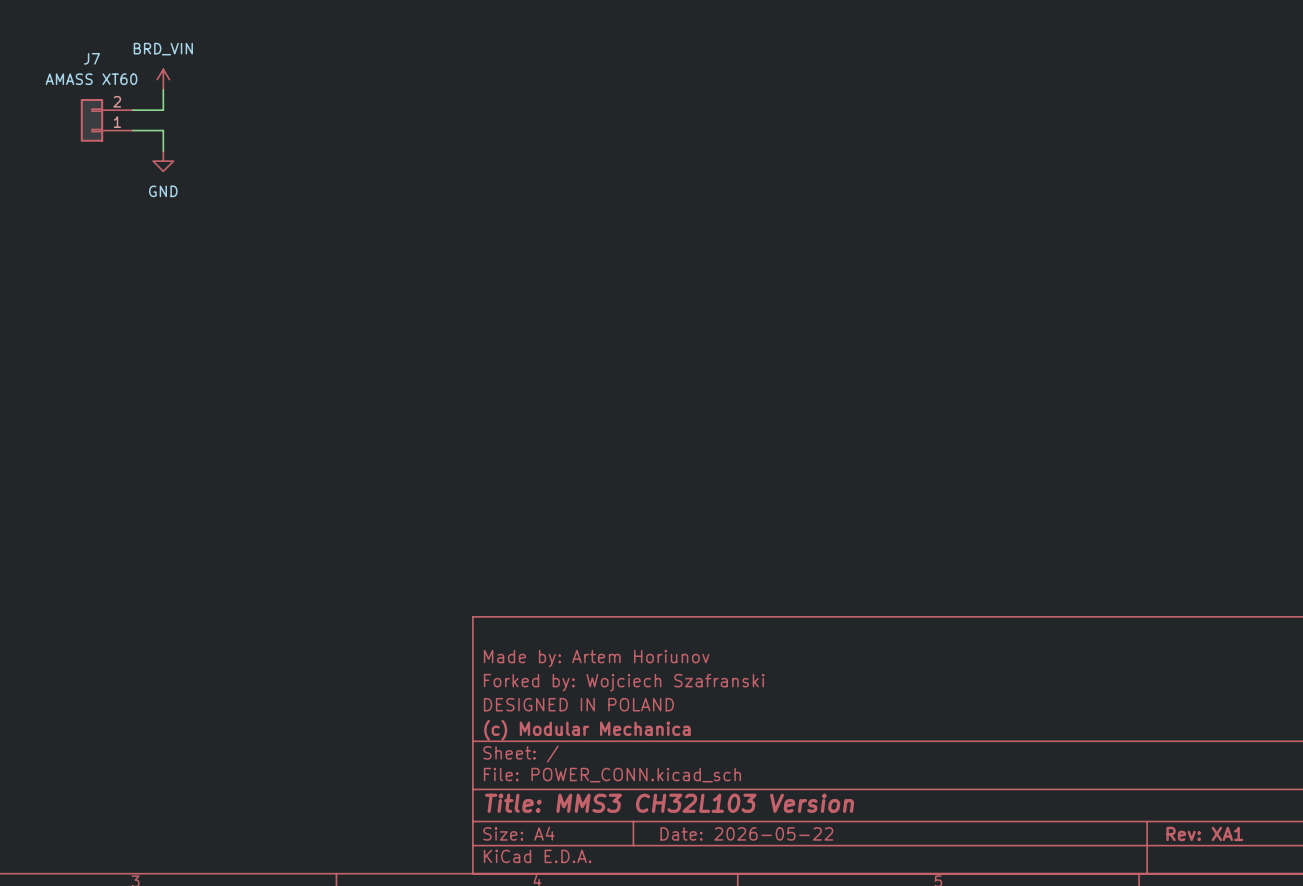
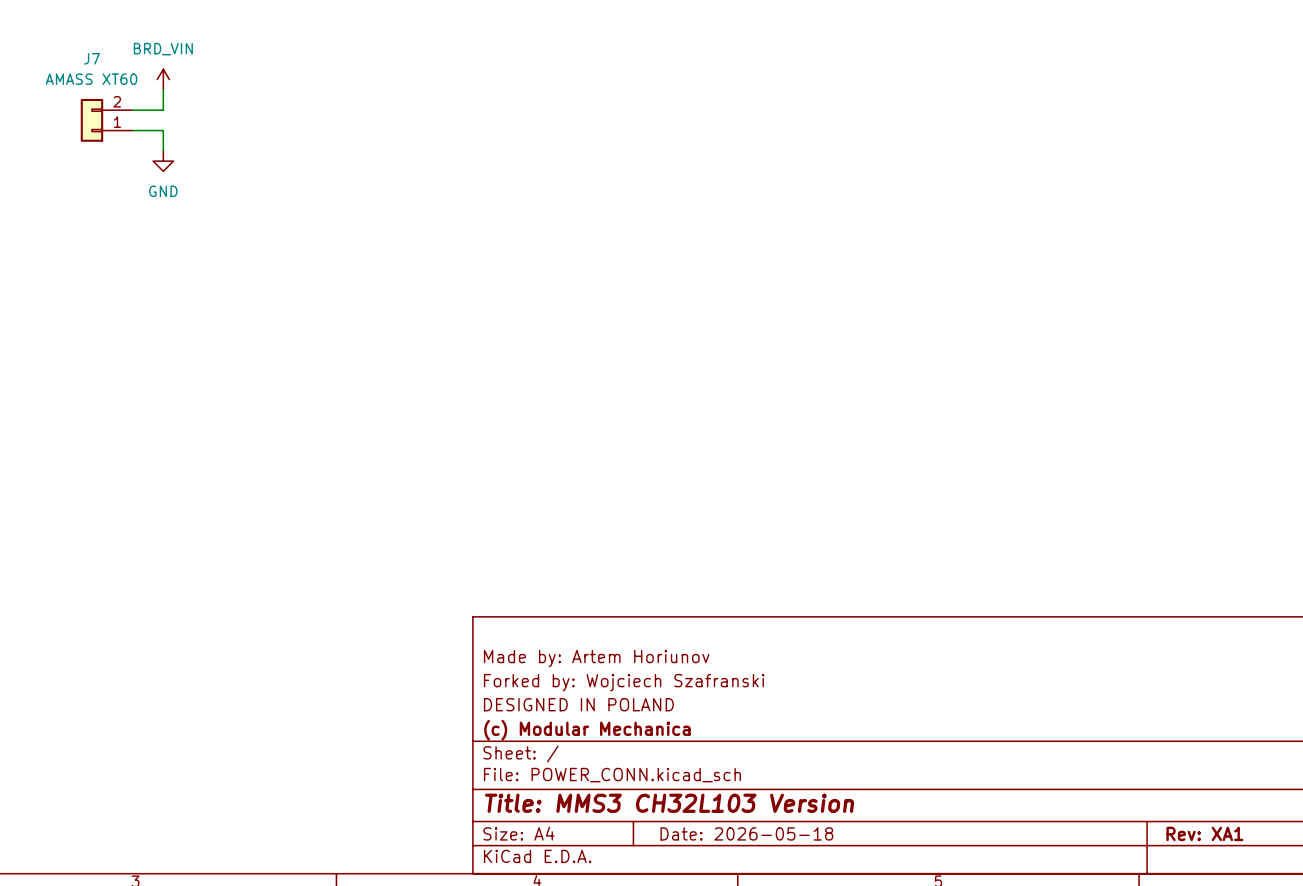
title block: Date: 2026-05-22 (746, 833) -> Date: 2026-05-18 (746, 833)

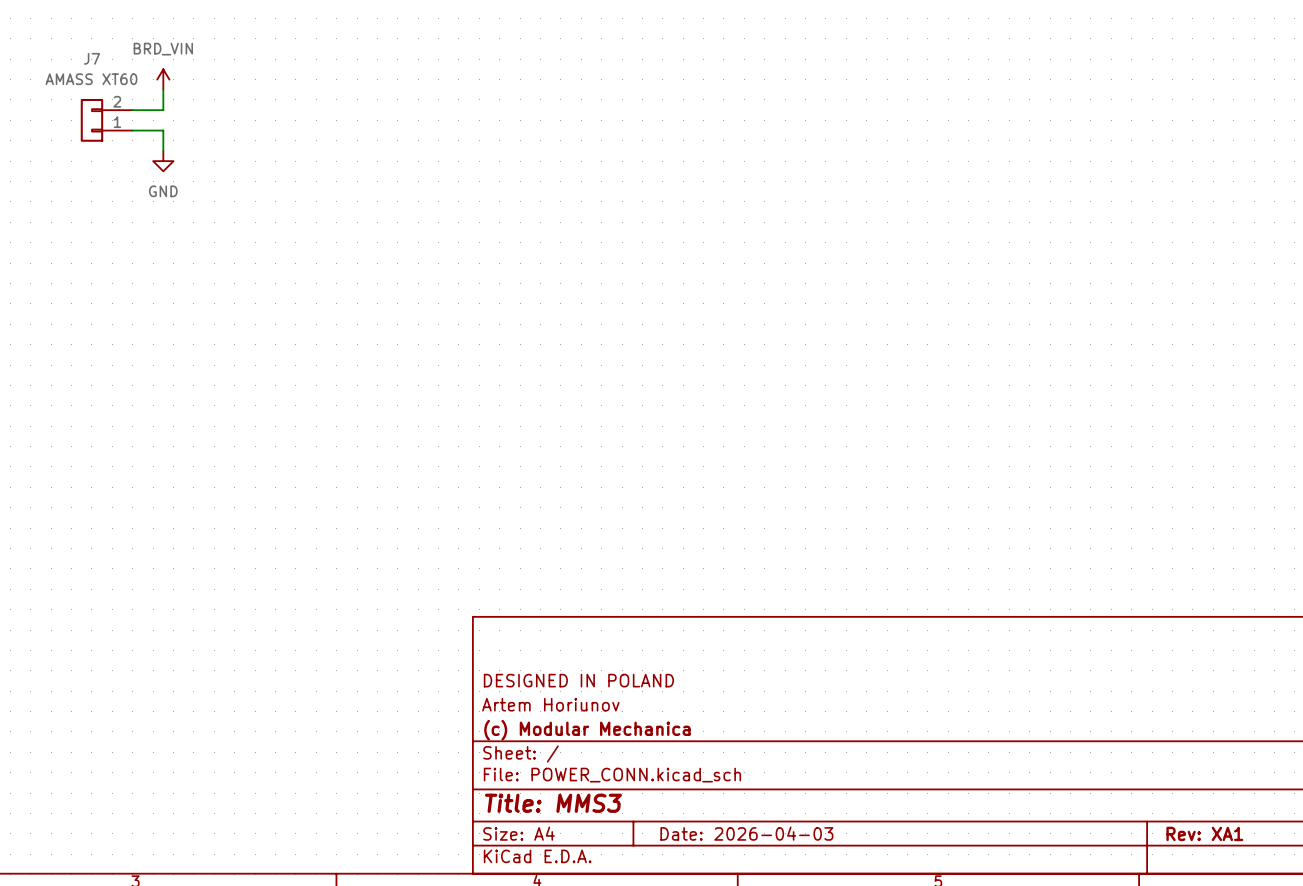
title block: Made by: Artem Horiunov (596, 658) -> none
title block: Forked by: Wojciech Szafranski (624, 682) -> DESIGNED IN POLAND (578, 680)
title block: DESIGNED IN POLAND (578, 704) -> Artem Horiunov (550, 704)
title block: Title: MMS3 CH32L103 Version (669, 803) -> Title: MMS3 (553, 803)
title block: Date: 2026-05-18 (746, 833) -> Date: 2026-04-03 (746, 833)

